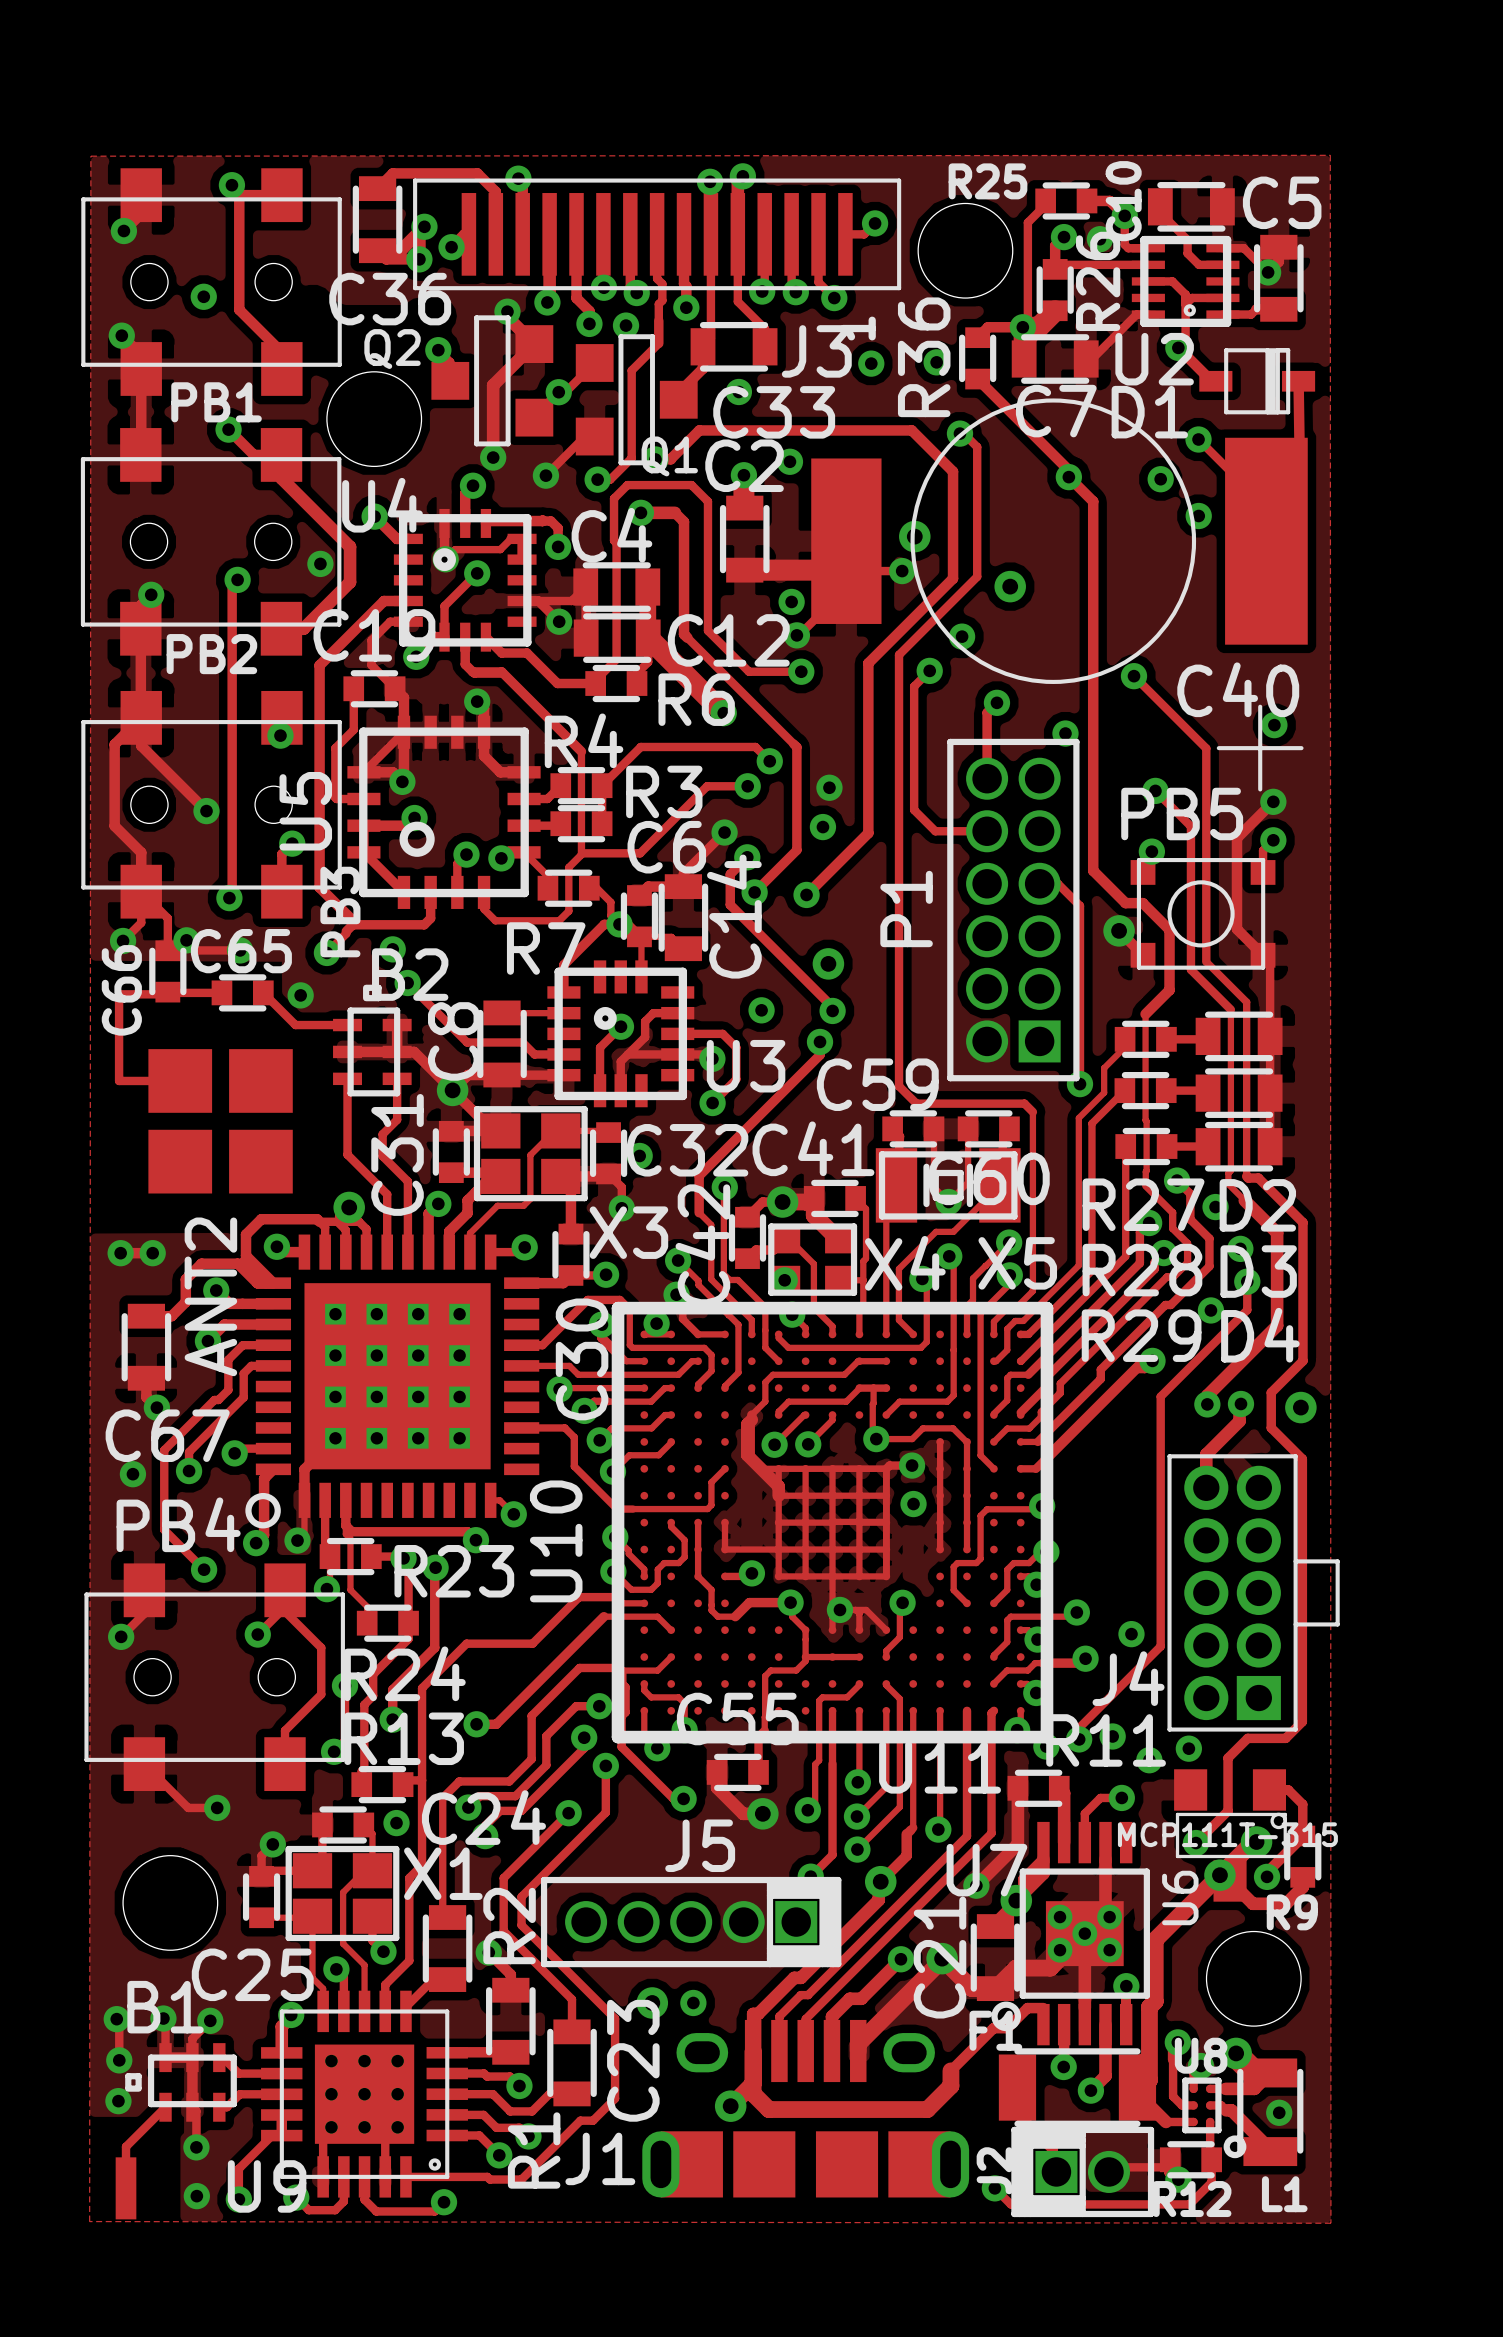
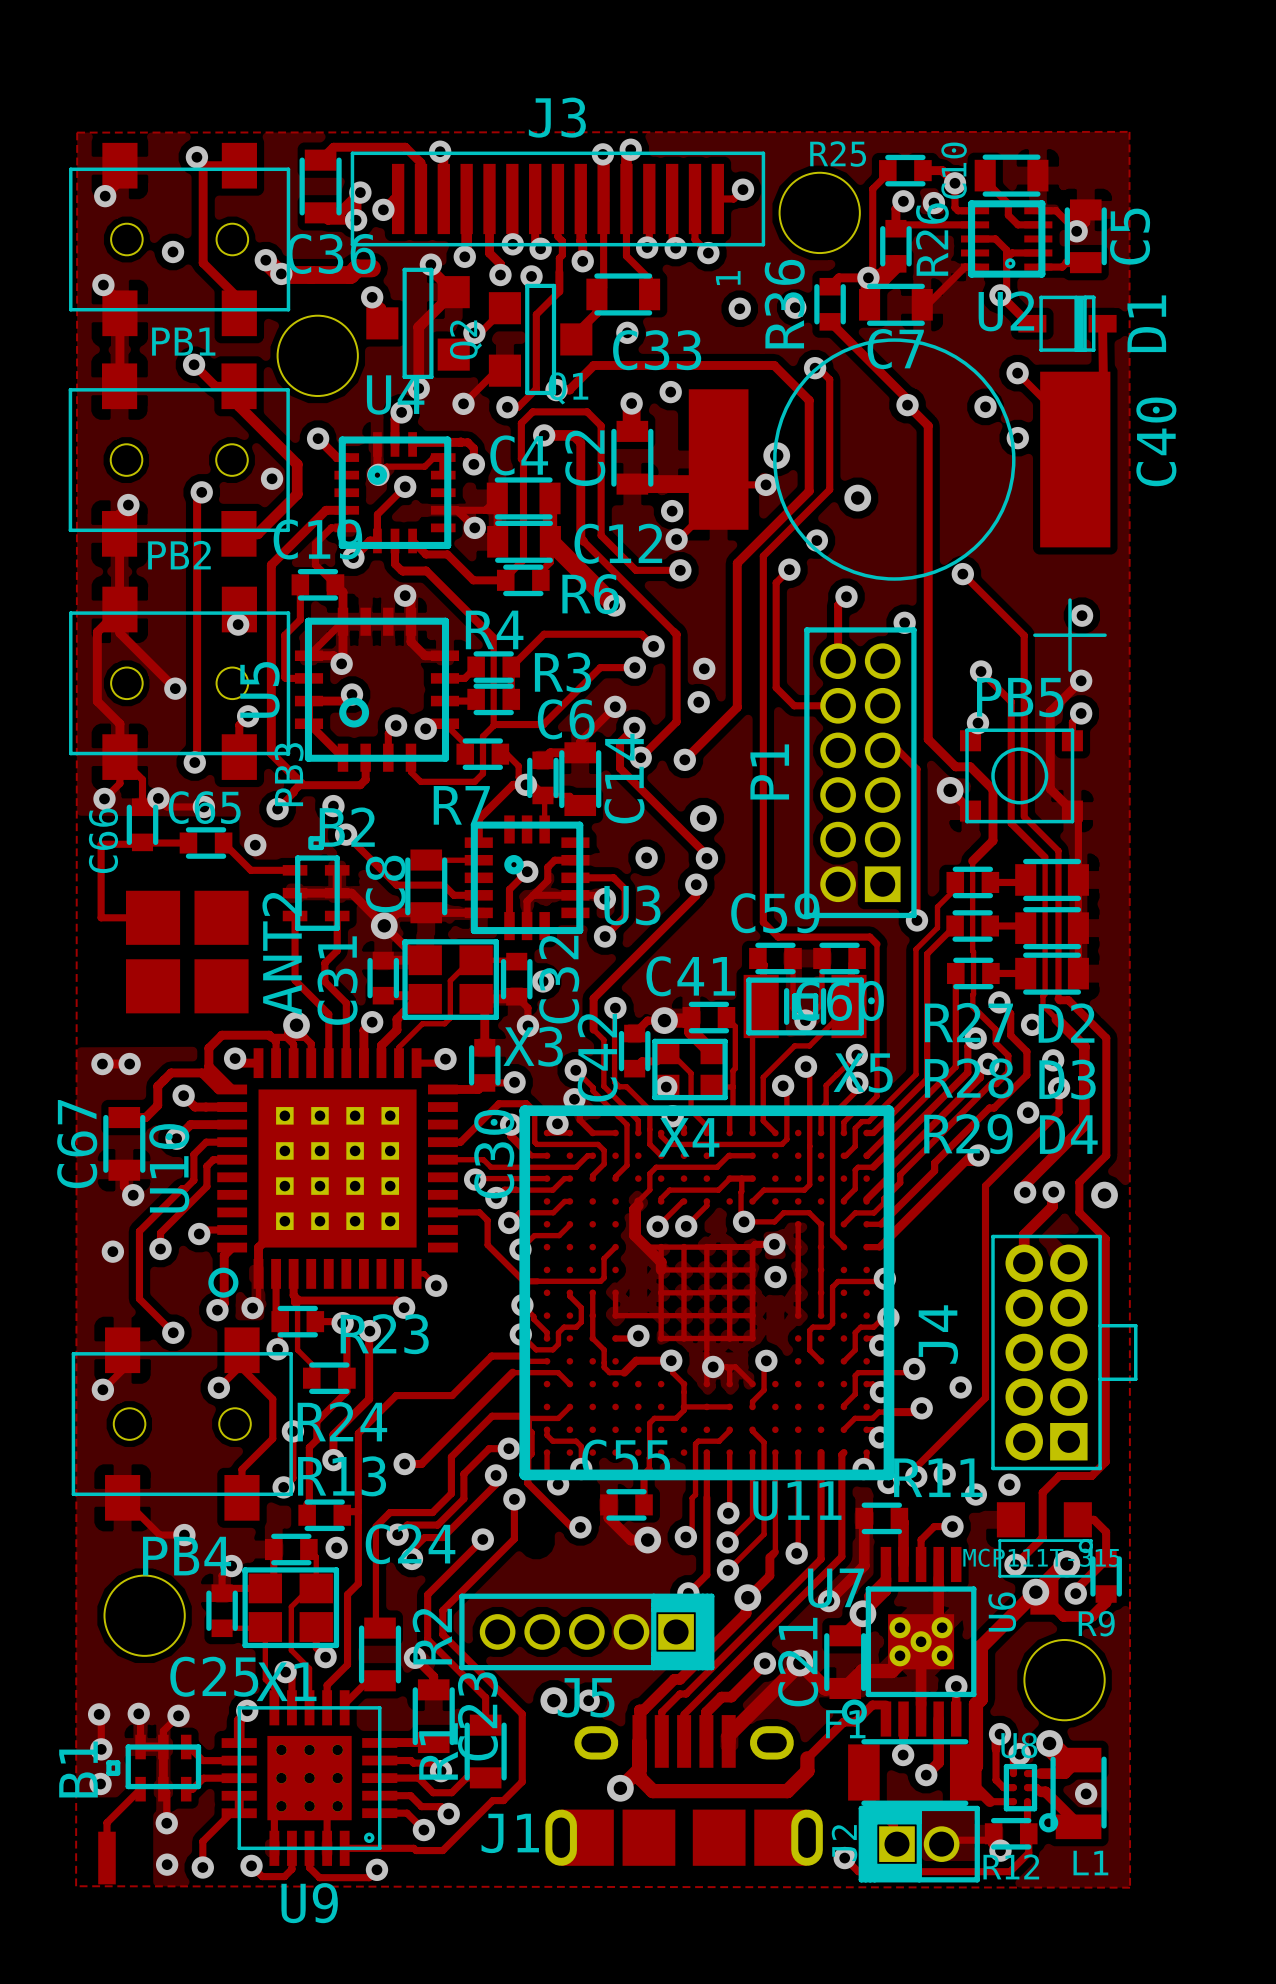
C5 name rotation: 0° (1282, 202) -> 90° counterclockwise (1130, 236)
track: none -> (265, 260) (280, 275) (350, 275) (357, 268) (371, 268)
via: none -> (265, 260)
via: none -> (281, 273)
Q2 name rotation: 0° (392, 349) -> 90° counterclockwise (465, 339)
Q2 name position: Q2 (392, 349) -> Q2 (465, 339)
J3 name position: J3 (816, 351) -> J3 (557, 117)
U2 name position: U2 (1154, 359) -> U2 (1006, 311)
D1 name rotation: 0° (1149, 412) -> 90° counterclockwise (1146, 323)
D1 name position: D1 (1149, 412) -> D1 (1146, 323)
C2 name rotation: 0° (744, 465) -> 90° counterclockwise (585, 458)
U4 name position: U4 (382, 505) -> U4 (395, 395)
C40 name rotation: 0° (1238, 689) -> 90° counterclockwise (1156, 441)
C40 name position: C40 (1238, 689) -> C40 (1156, 441)
PB5 name position: PB5 (1182, 814) -> PB5 (1020, 697)
C59 name position: C59 (877, 1084) -> C59 (775, 913)
C32 name rotation: 0° (687, 1150) -> 90° counterclockwise (559, 979)
X4 name position: X4 (905, 1263) -> X4 (688, 1137)
ANT2 name position: ANT2 (210, 1296) -> ANT2 (282, 953)
C67 name rotation: 0° (167, 1435) -> 90° counterclockwise (77, 1144)
PB4 name position: PB4 (178, 1524) -> PB4 (187, 1556)
U10 name position: U10 (556, 1541) -> U10 (169, 1168)
J4 name rotation: 0° (1128, 1678) -> 90° counterclockwise (938, 1334)
J4 name position: J4 (1128, 1678) -> J4 (938, 1334)
J5 name position: J5 (700, 1845) -> J5 (586, 1697)
X1 name position: X1 (443, 1873) -> X1 (286, 1681)
B1 name rotation: 0° (165, 2007) -> 90° counterclockwise (78, 1769)
C23 name position: C23 (633, 2060) -> C23 (477, 1716)
R1 name position: R1 (534, 2150) -> R1 (438, 1751)
U9 name position: U9 (267, 2186) -> U9 (309, 1903)

